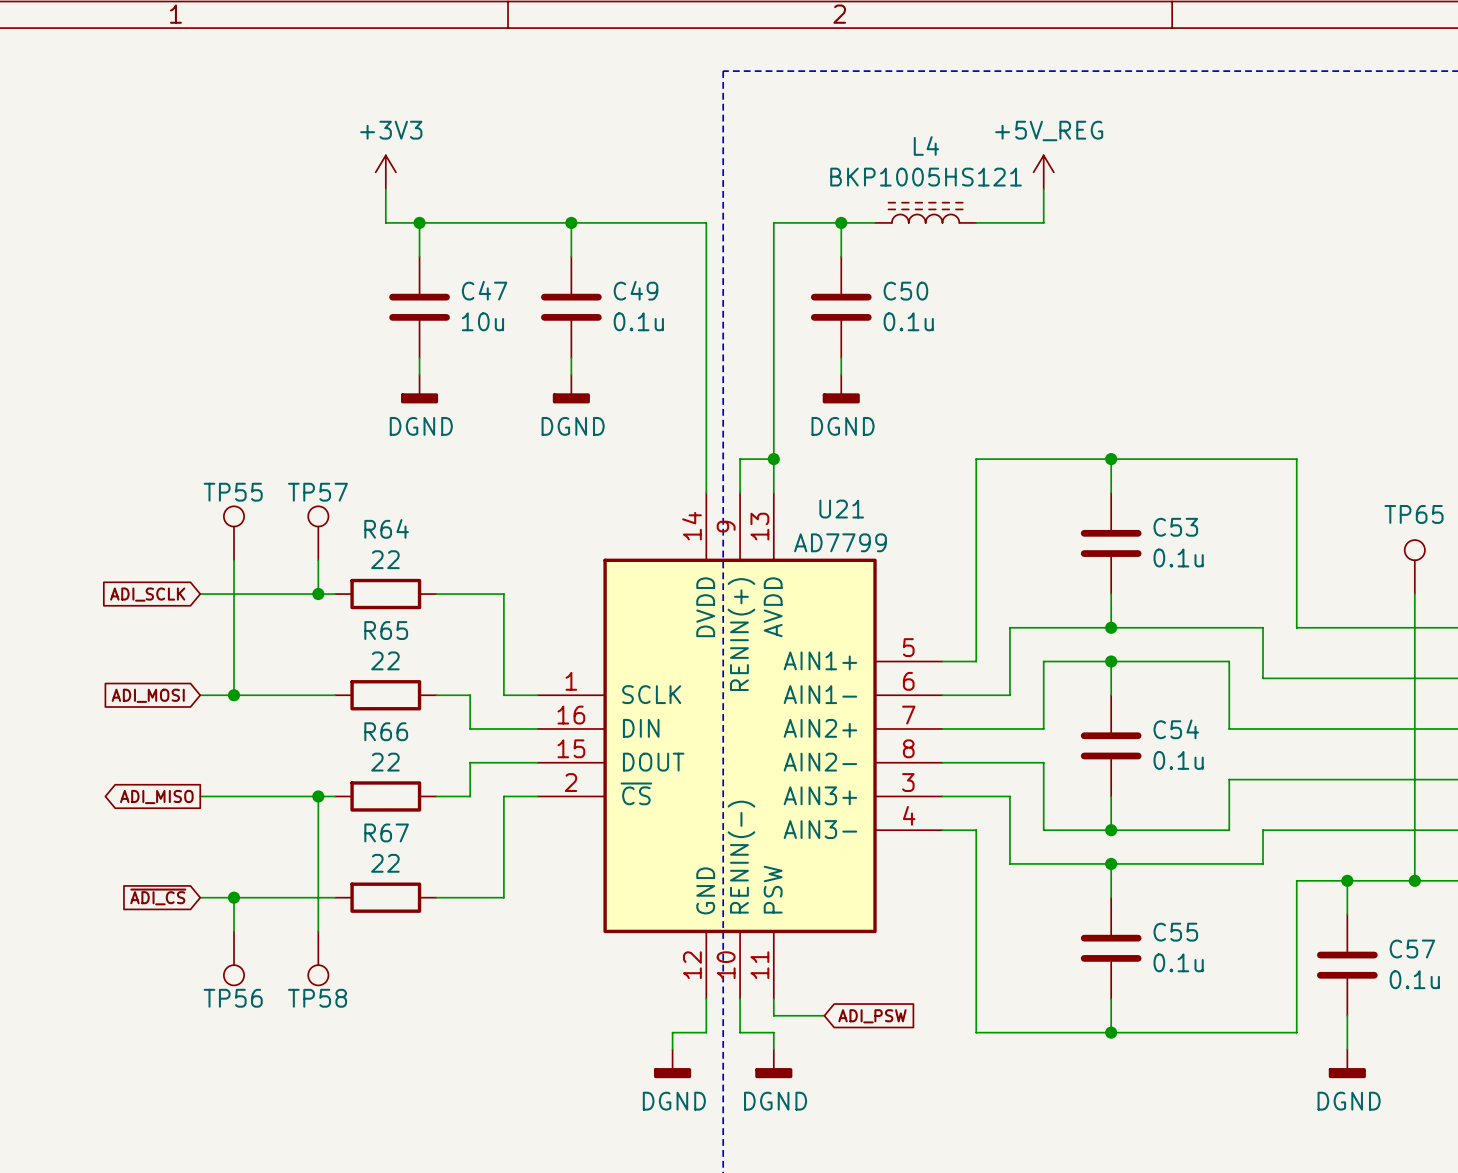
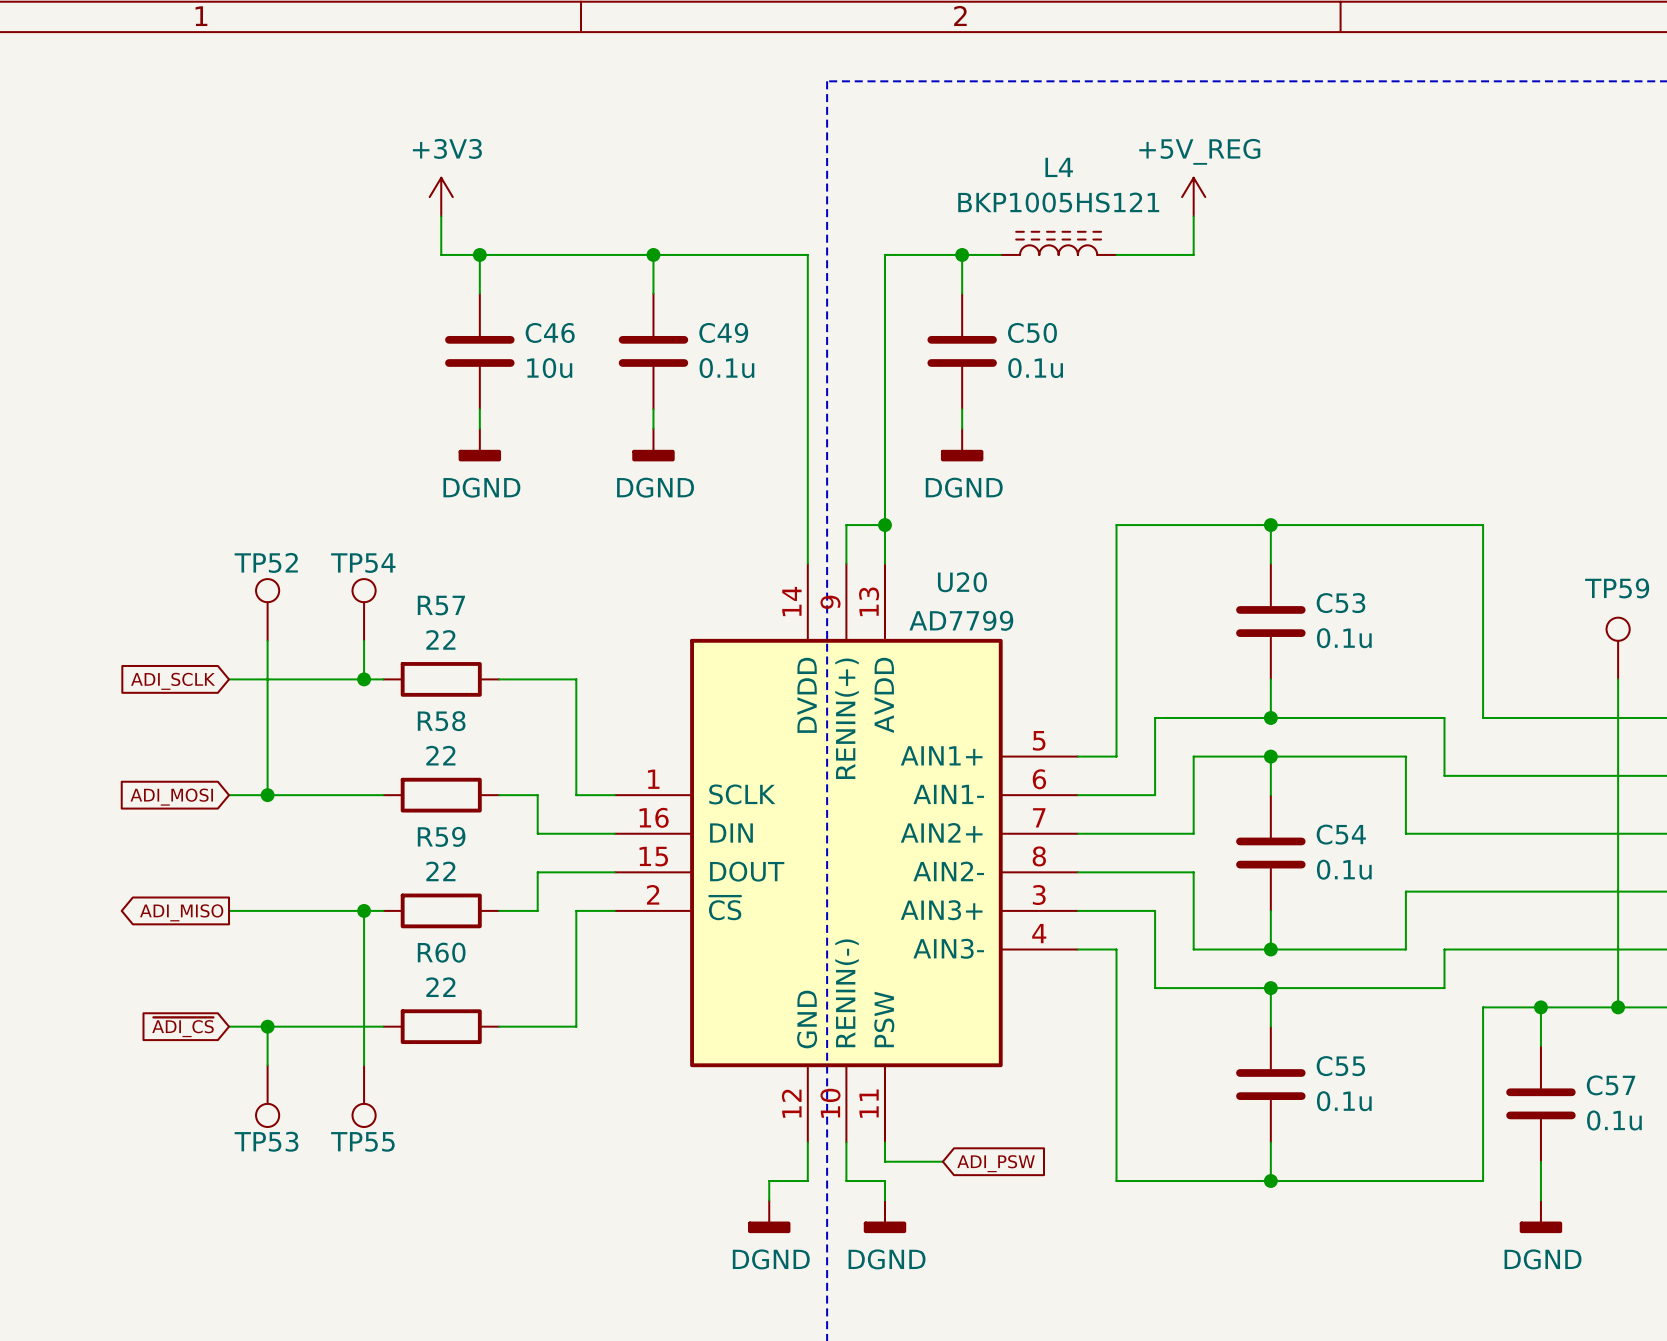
C47 name: C47 (484, 290) -> C46 (550, 332)
TP55 name: TP55 (233, 492) -> TP52 (266, 562)
TP57 name: TP57 (317, 492) -> TP54 (363, 563)
U21 name: U21 (841, 509) -> U20 (962, 582)
TP65 name: TP65 (1414, 514) -> TP59 (1617, 588)
R64 name: R64 (386, 528) -> R57 (441, 605)
R65 name: R65 (386, 630) -> R58 (441, 721)
R66 name: R66 (386, 731) -> R59 (441, 836)
R67 name: R67 (386, 832) -> R60 (441, 952)
TP56 name: TP56 (233, 998) -> TP53 (266, 1141)
TP58 name: TP58 (317, 998) -> TP55 (362, 1141)

